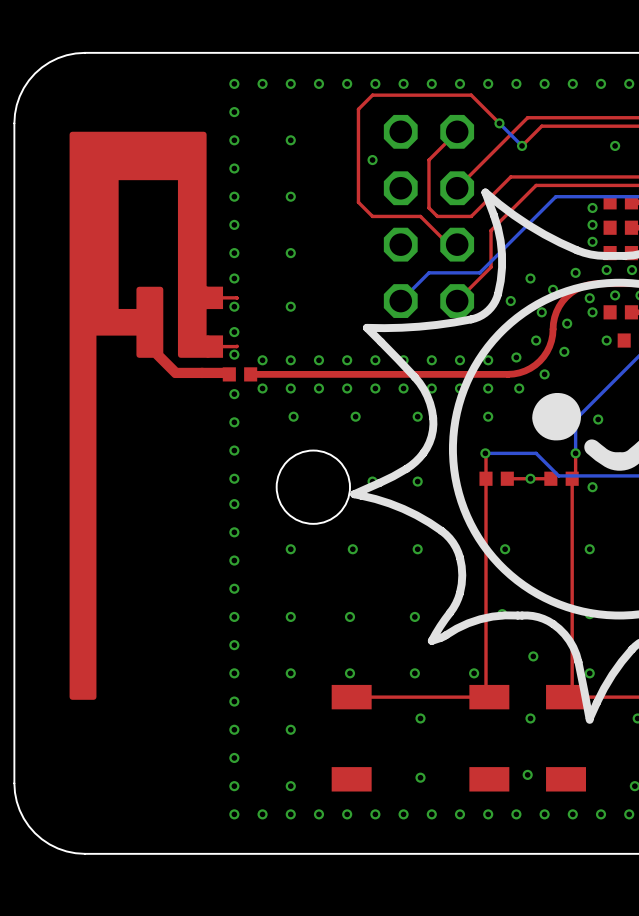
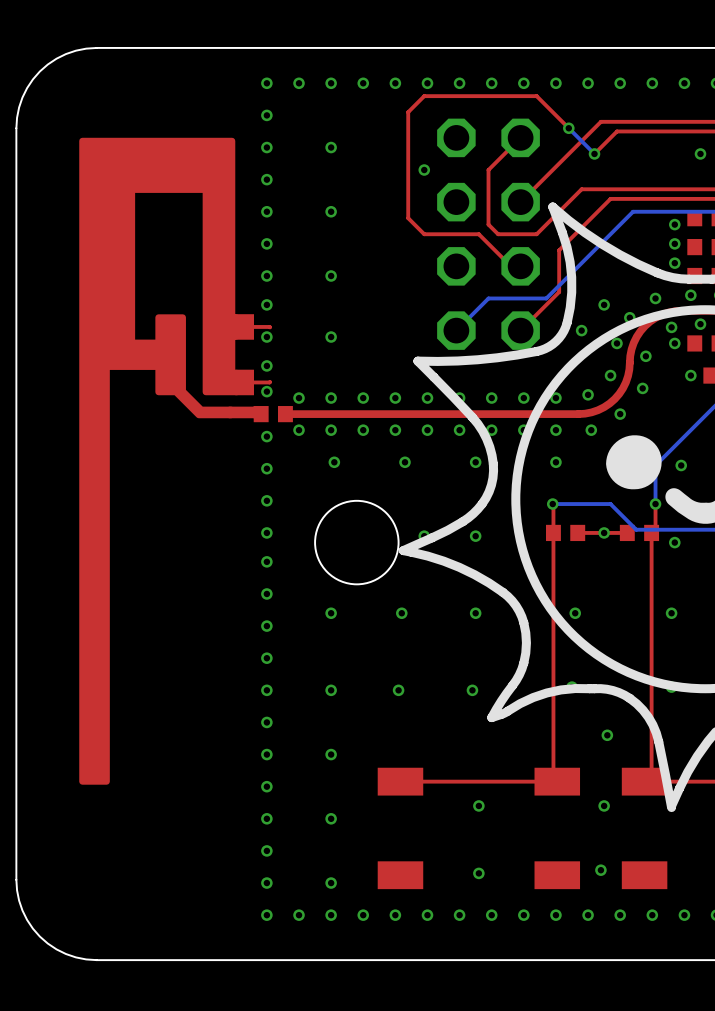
via: (350, 673) -> none
via: (414, 673) -> none
via: (474, 673) -> none
via: (589, 673) -> none

